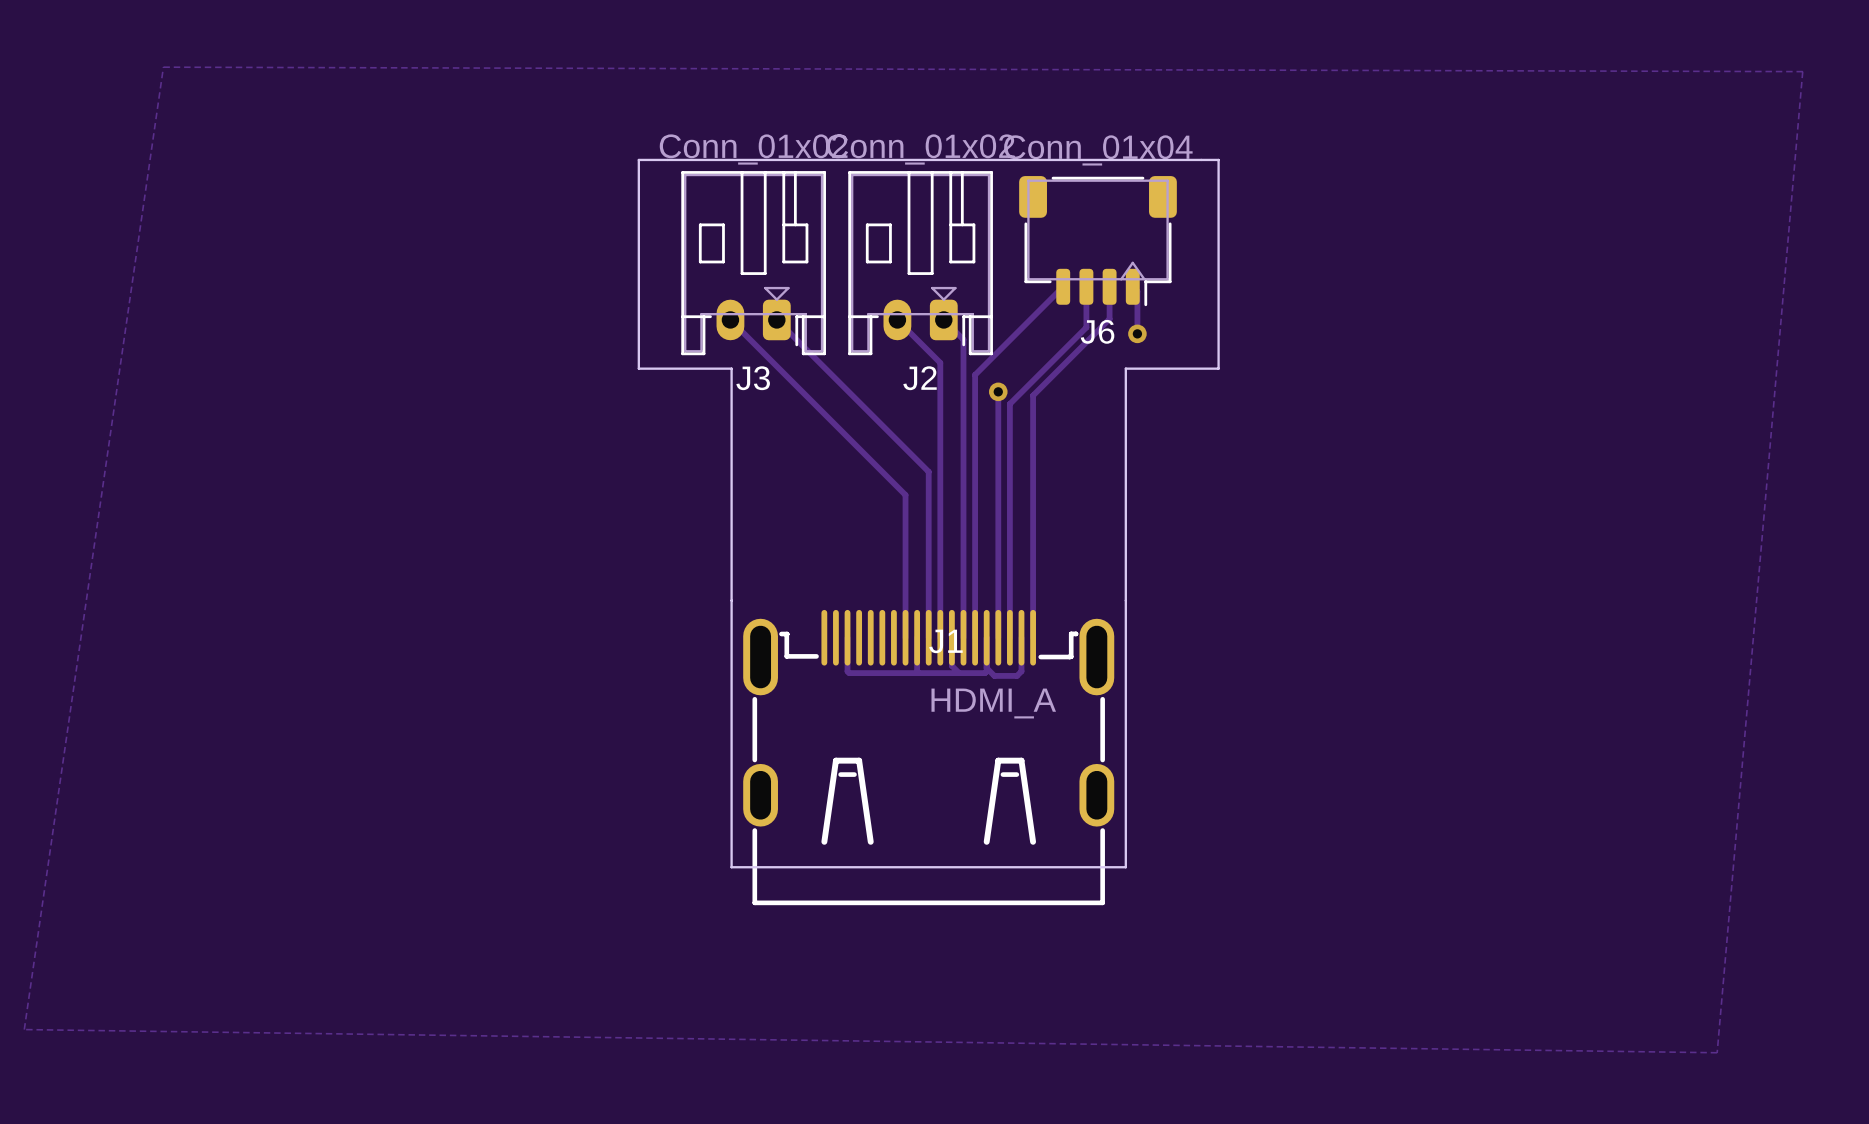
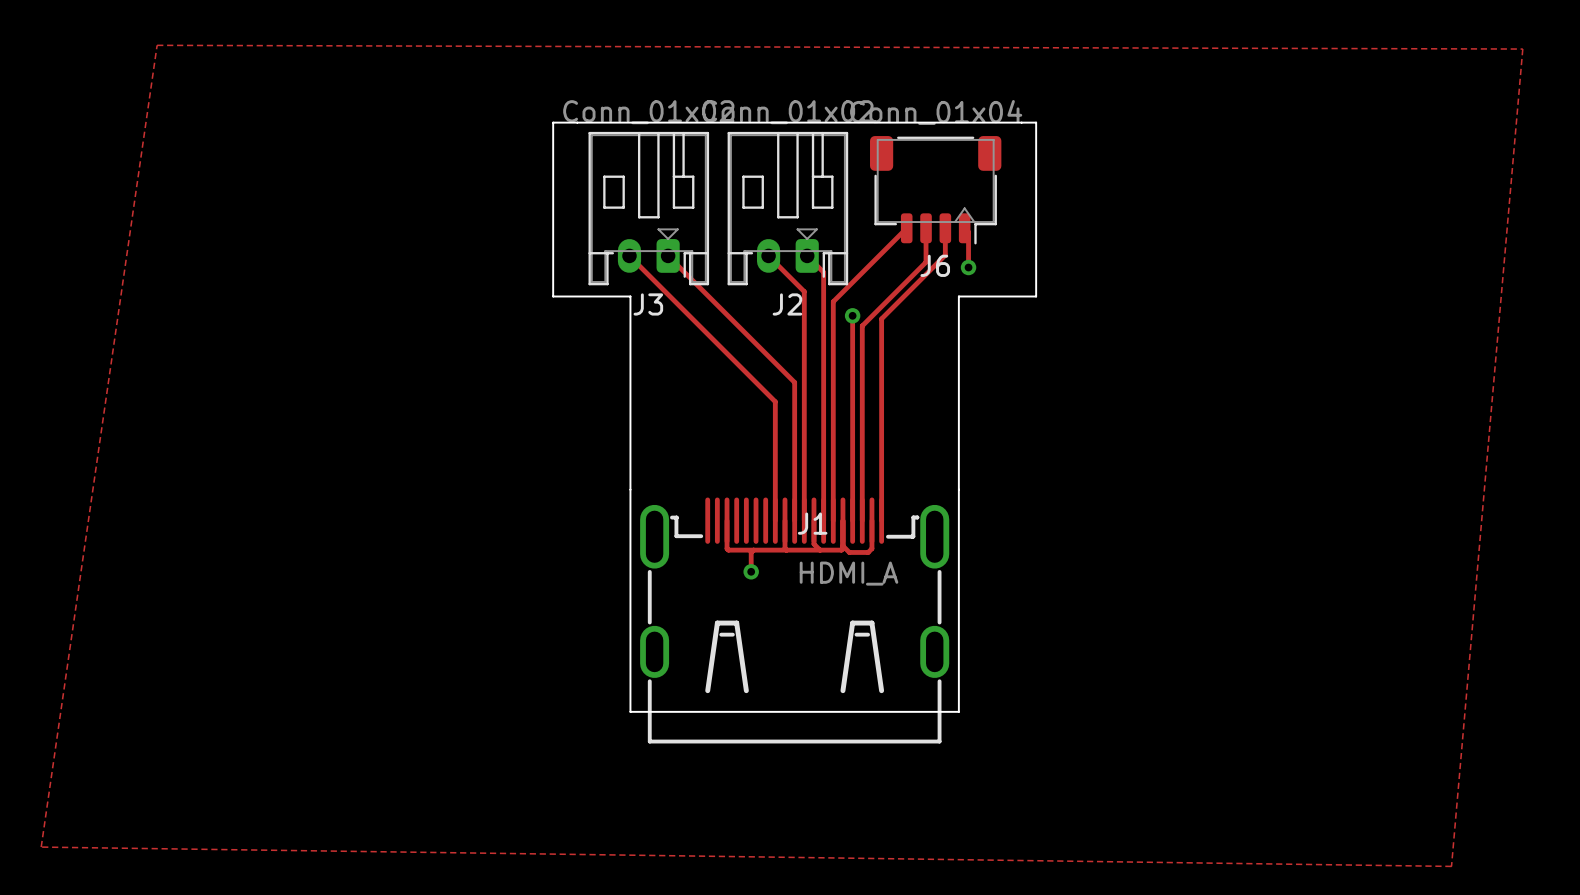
track: none -> (753, 550) (751, 552) (751, 571)
via: none -> (751, 571)

